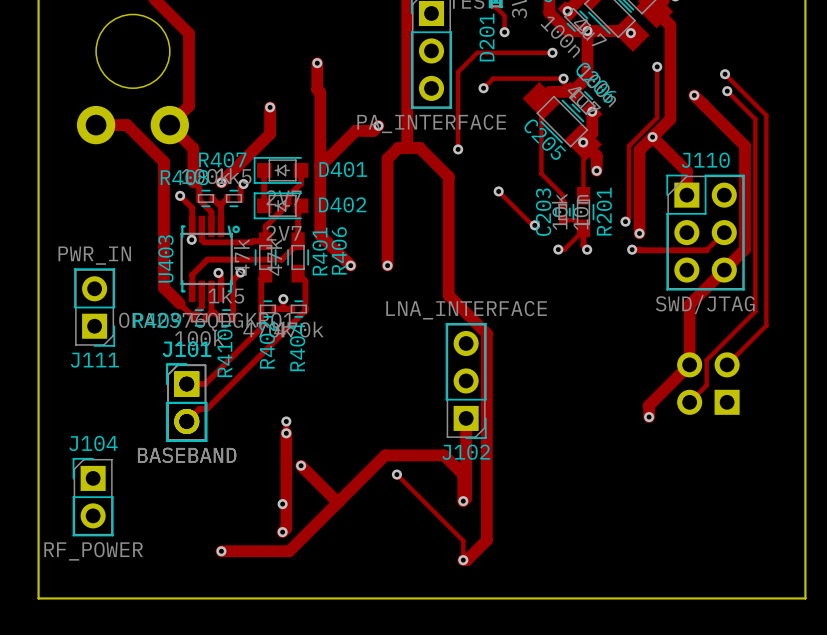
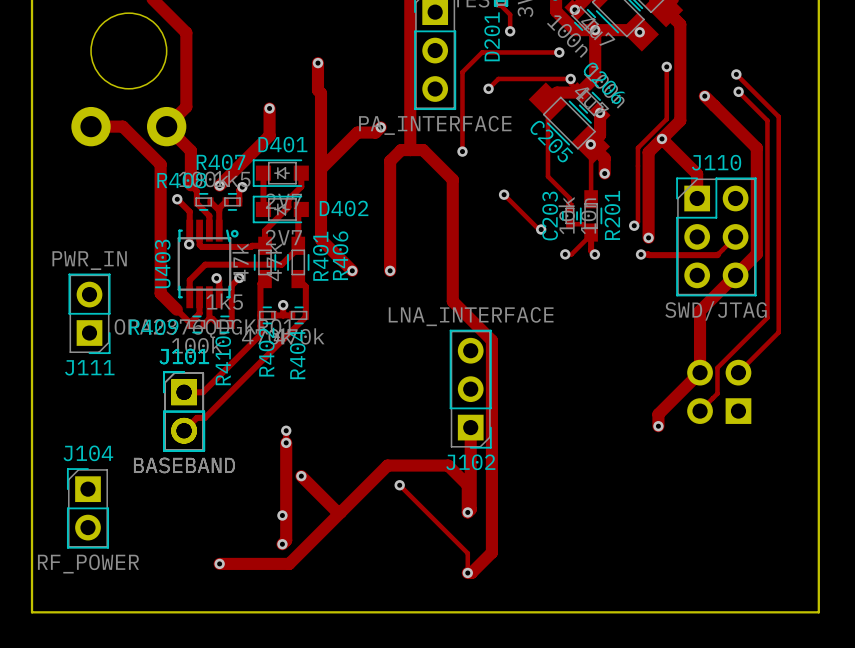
D401 name position: D401 (343, 169) -> D401 (282, 144)

